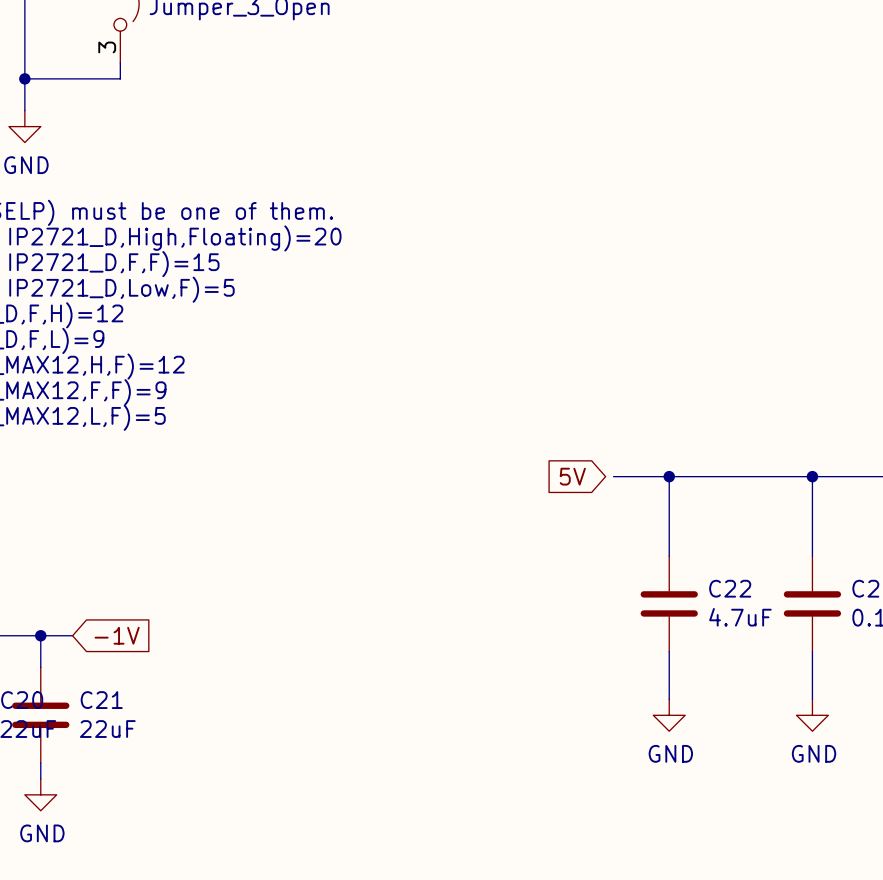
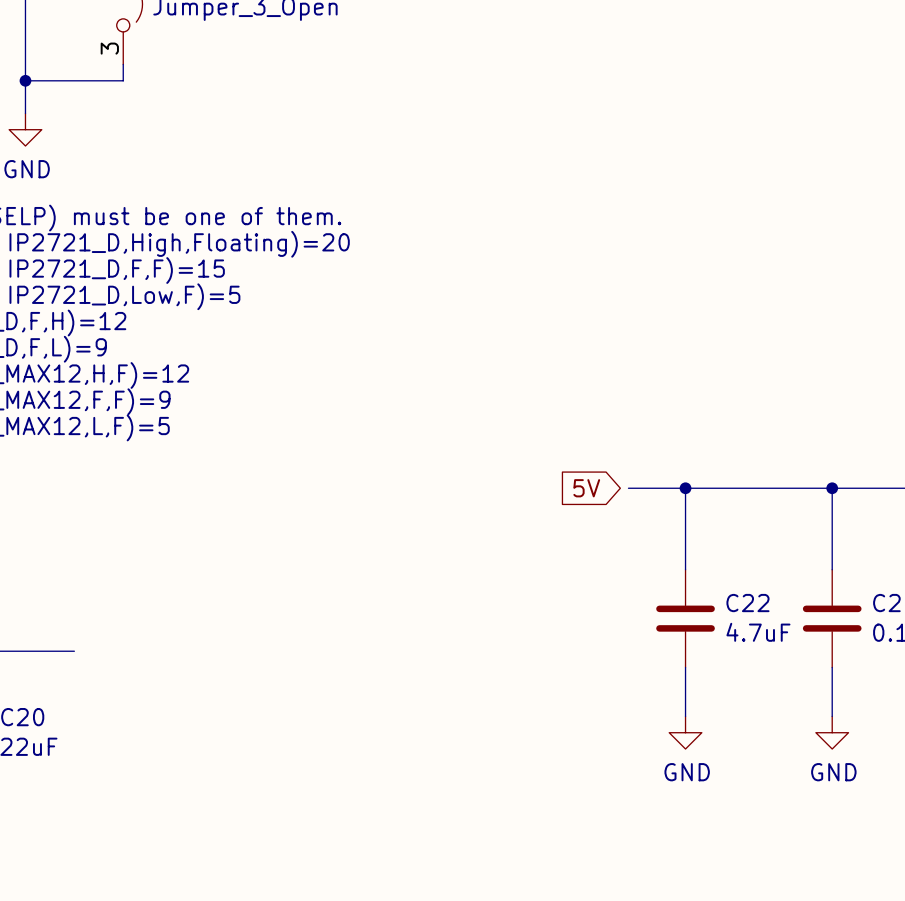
wire: (40, 635) (40, 667) -> none
junction: (40, 635) -> none
global label: -1V (117, 635) -> none
C21: 22uF (40, 715) -> none
wire: (40, 763) (40, 778) -> none
power symbol: GND (40, 794) -> none

